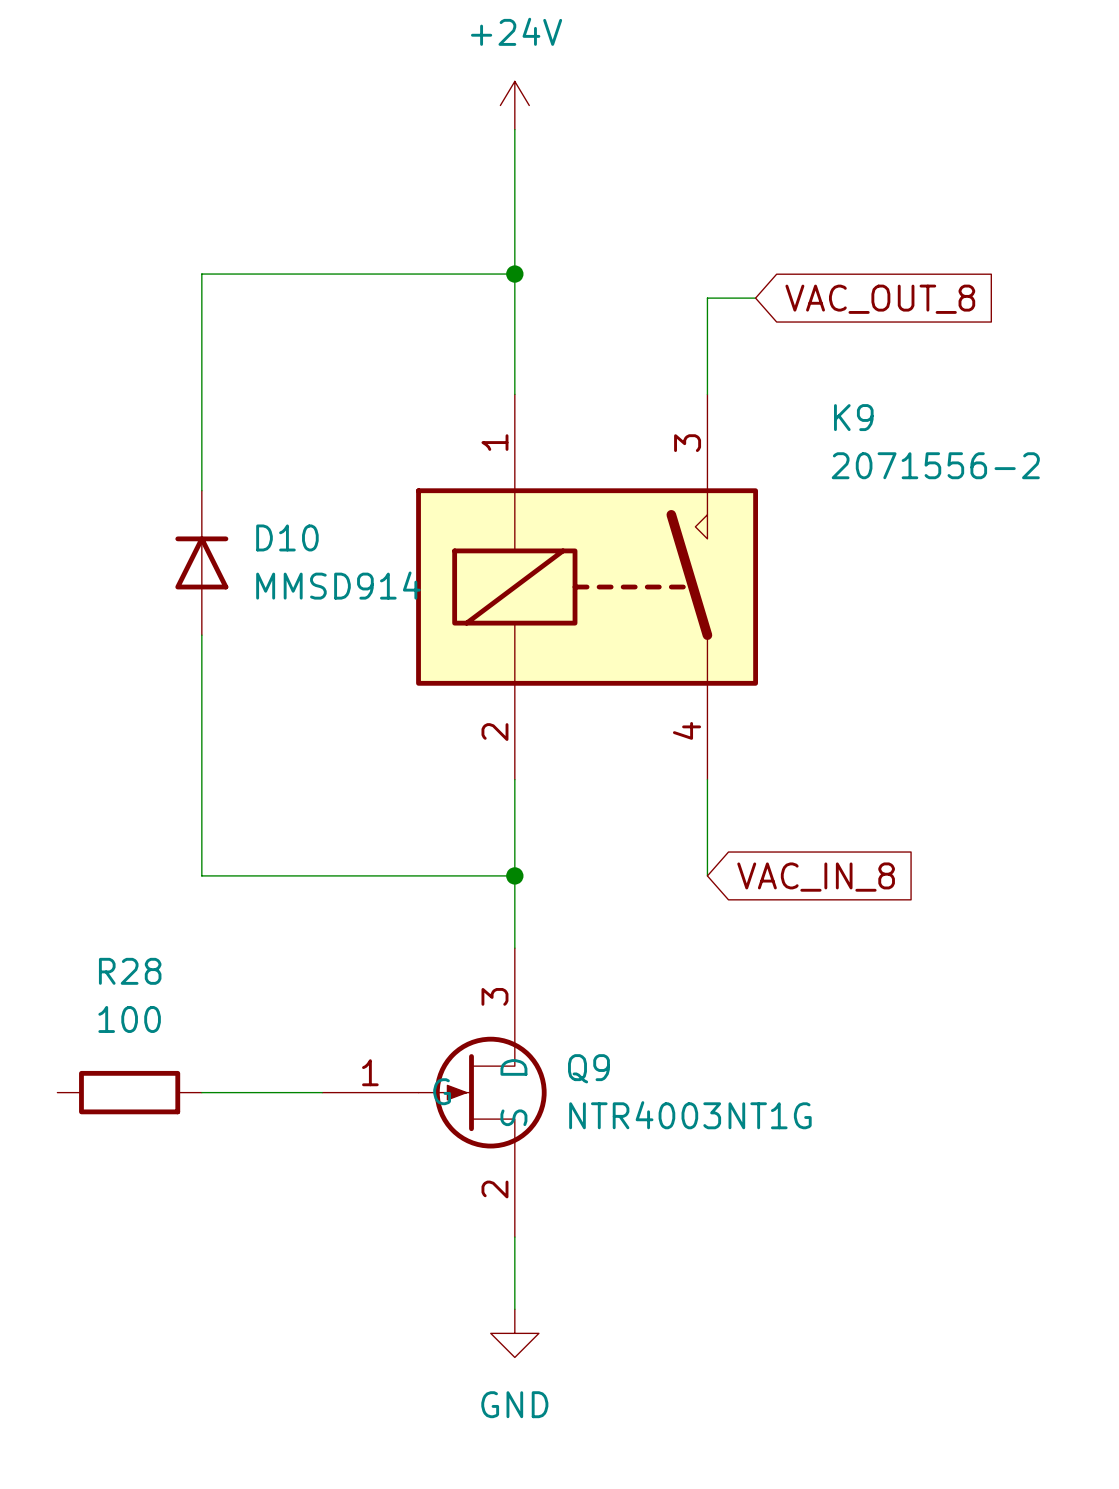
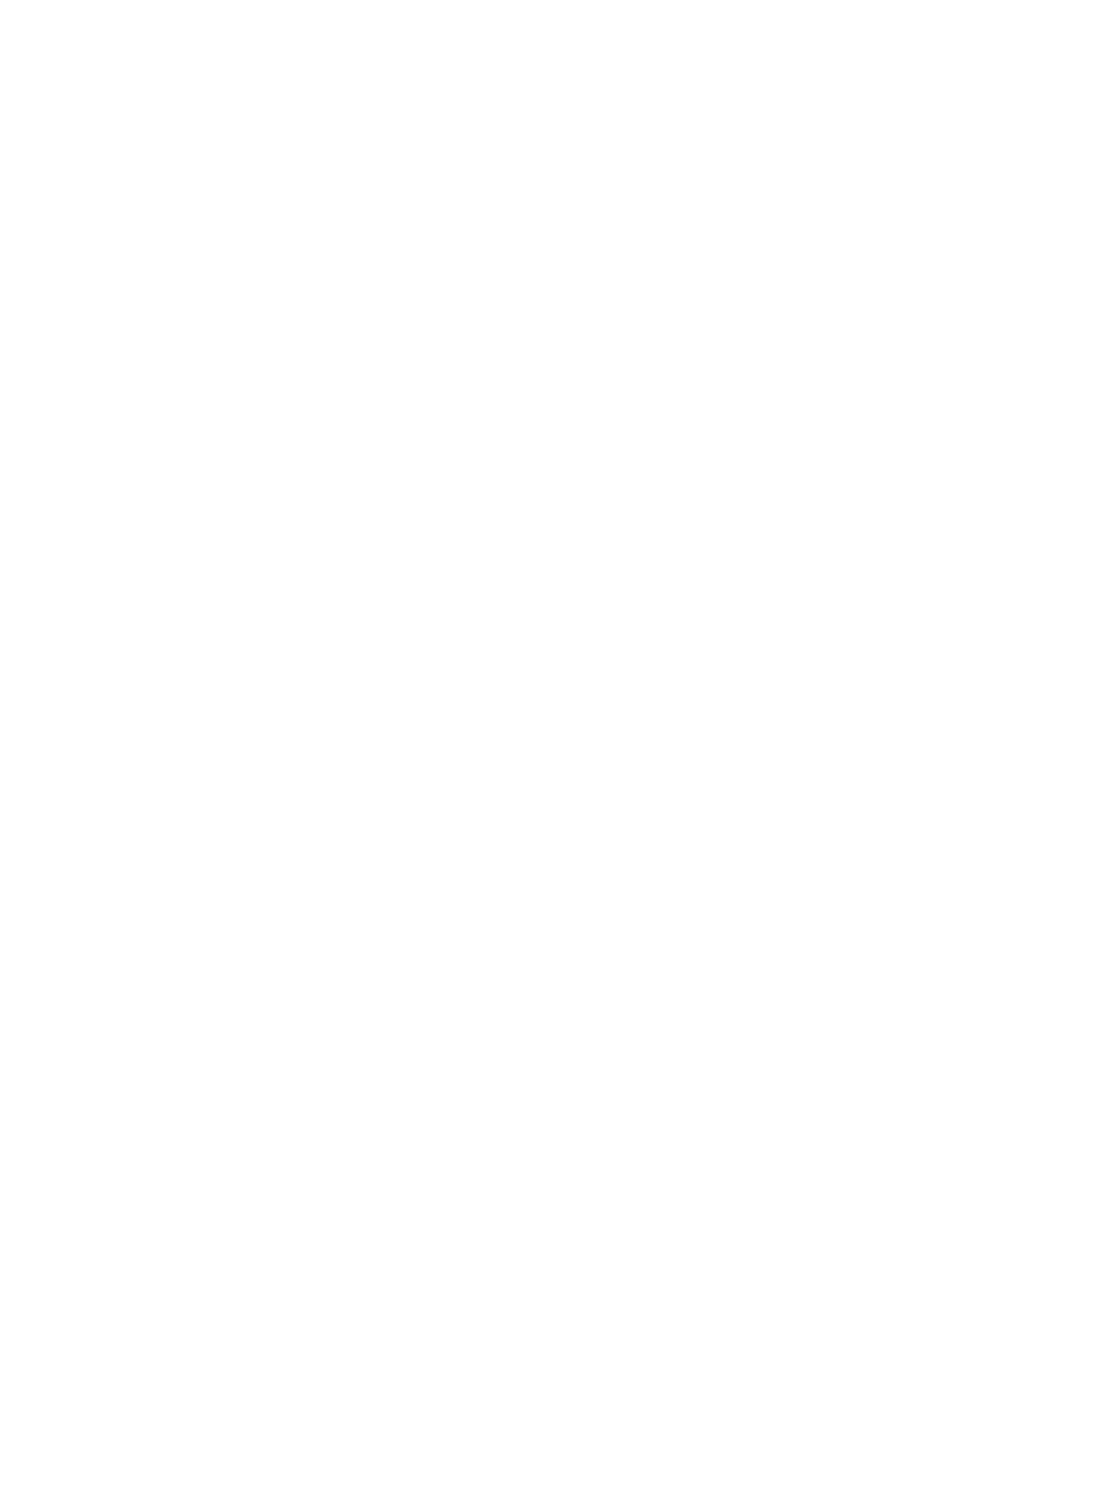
power symbol: +24V (514, 105) -> none
wire: (514, 129) (514, 394) -> none
wire: (514, 274) (201, 274) (201, 490) -> none
junction: (514, 274) -> none
wire: (755, 298) (707, 298) (707, 394) -> none
global label: VAC_OUT_8 (880, 299) -> none
D10: MMSD914 (201, 562) -> none
K9: 2071556-2 (587, 587) -> none
wire: (201, 635) (201, 875) (514, 875) -> none
wire: (514, 779) (514, 948) -> none
wire: (707, 779) (707, 875) -> none
junction: (514, 875) -> none
global label: VAC_IN_8 (816, 877) -> none
R28: 100 (129, 1092) -> none
wire: (201, 1092) (322, 1092) -> none
Q9: NTR4003NT1G (434, 1092) -> none
wire: (514, 1237) (514, 1309) -> none
power symbol: GND (514, 1333) -> none

